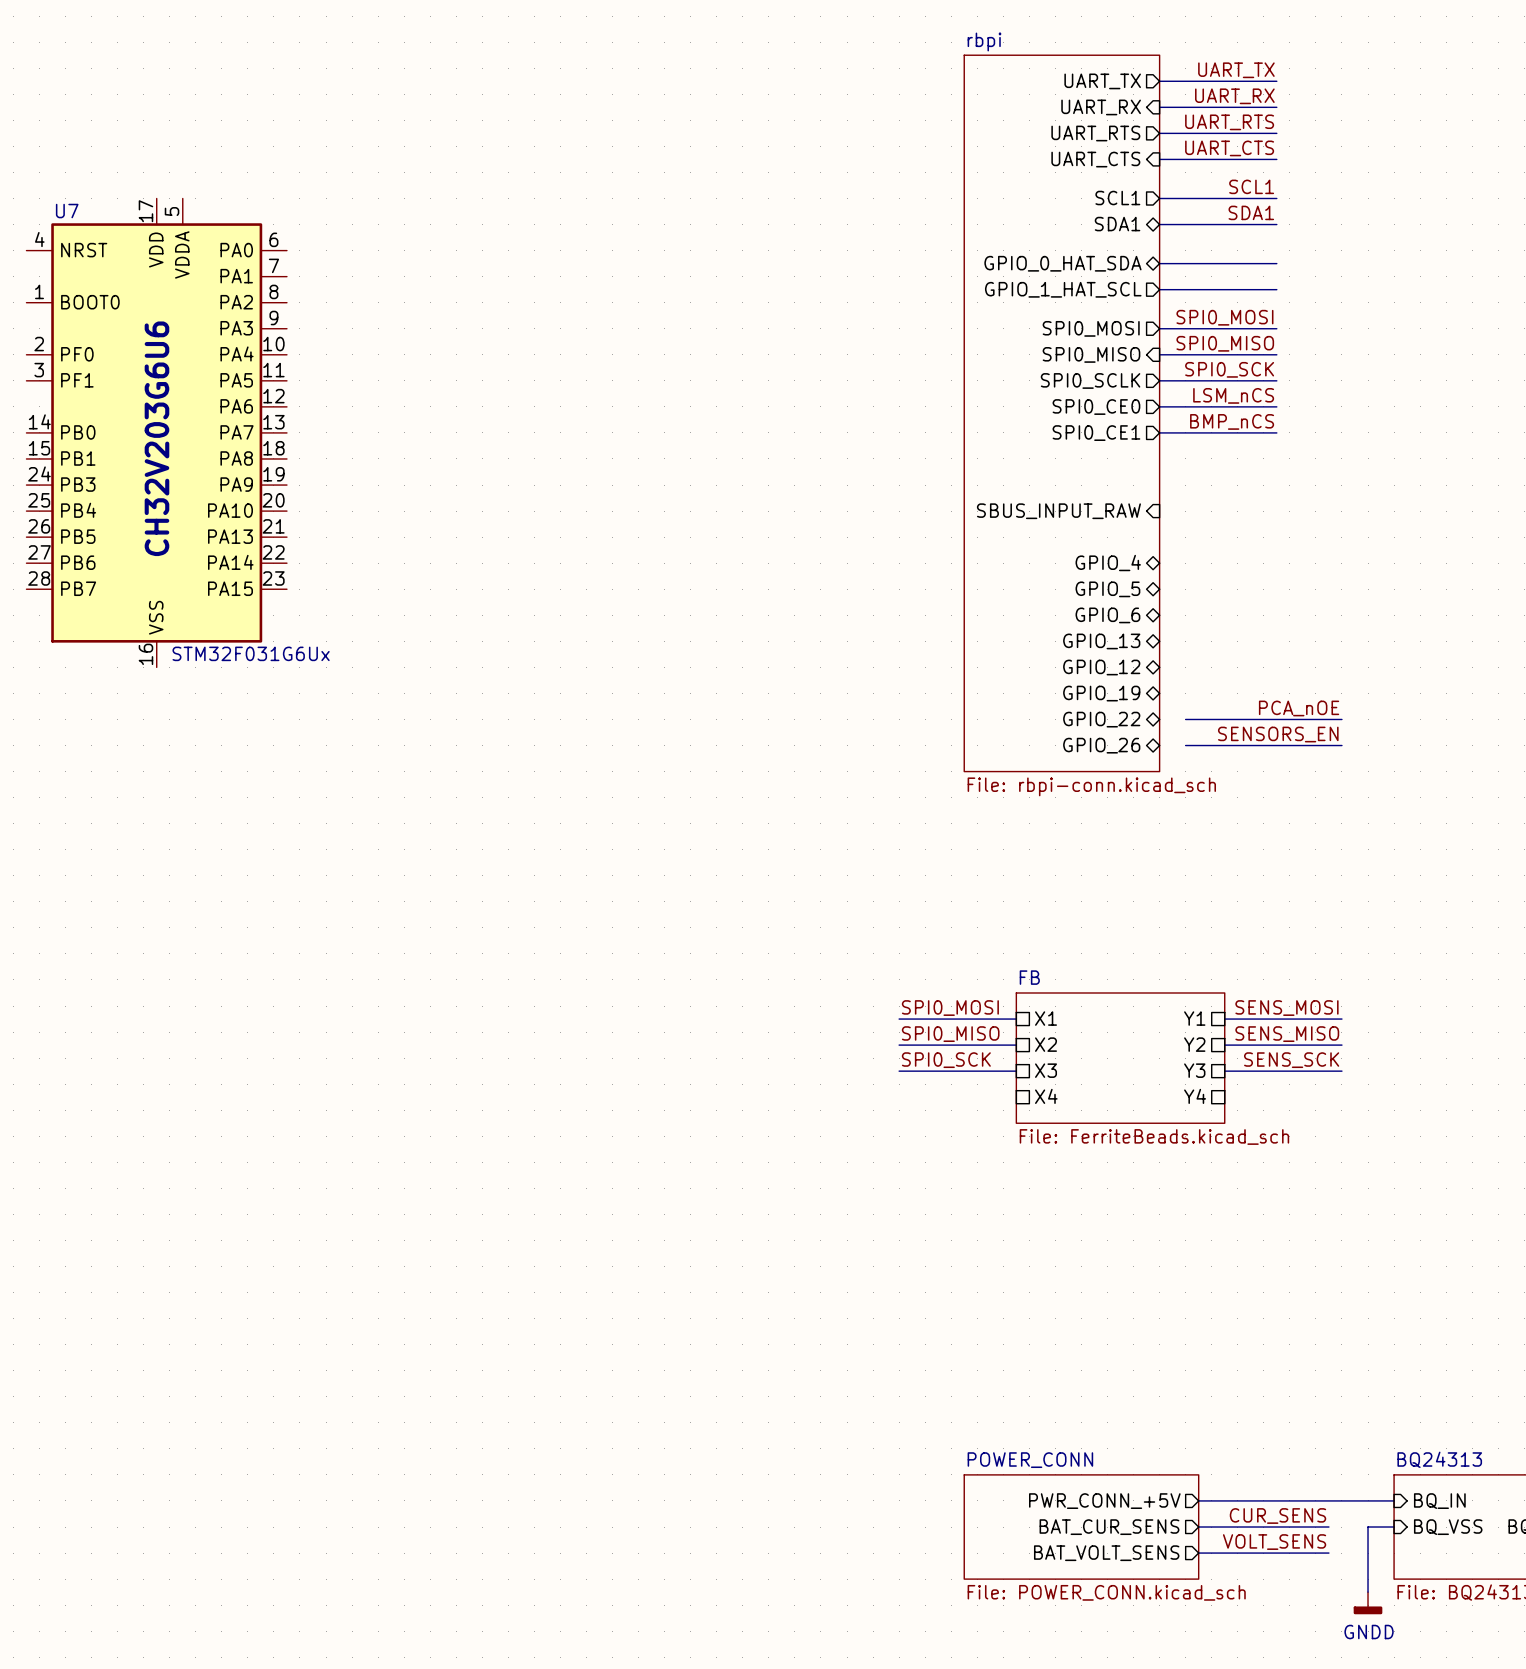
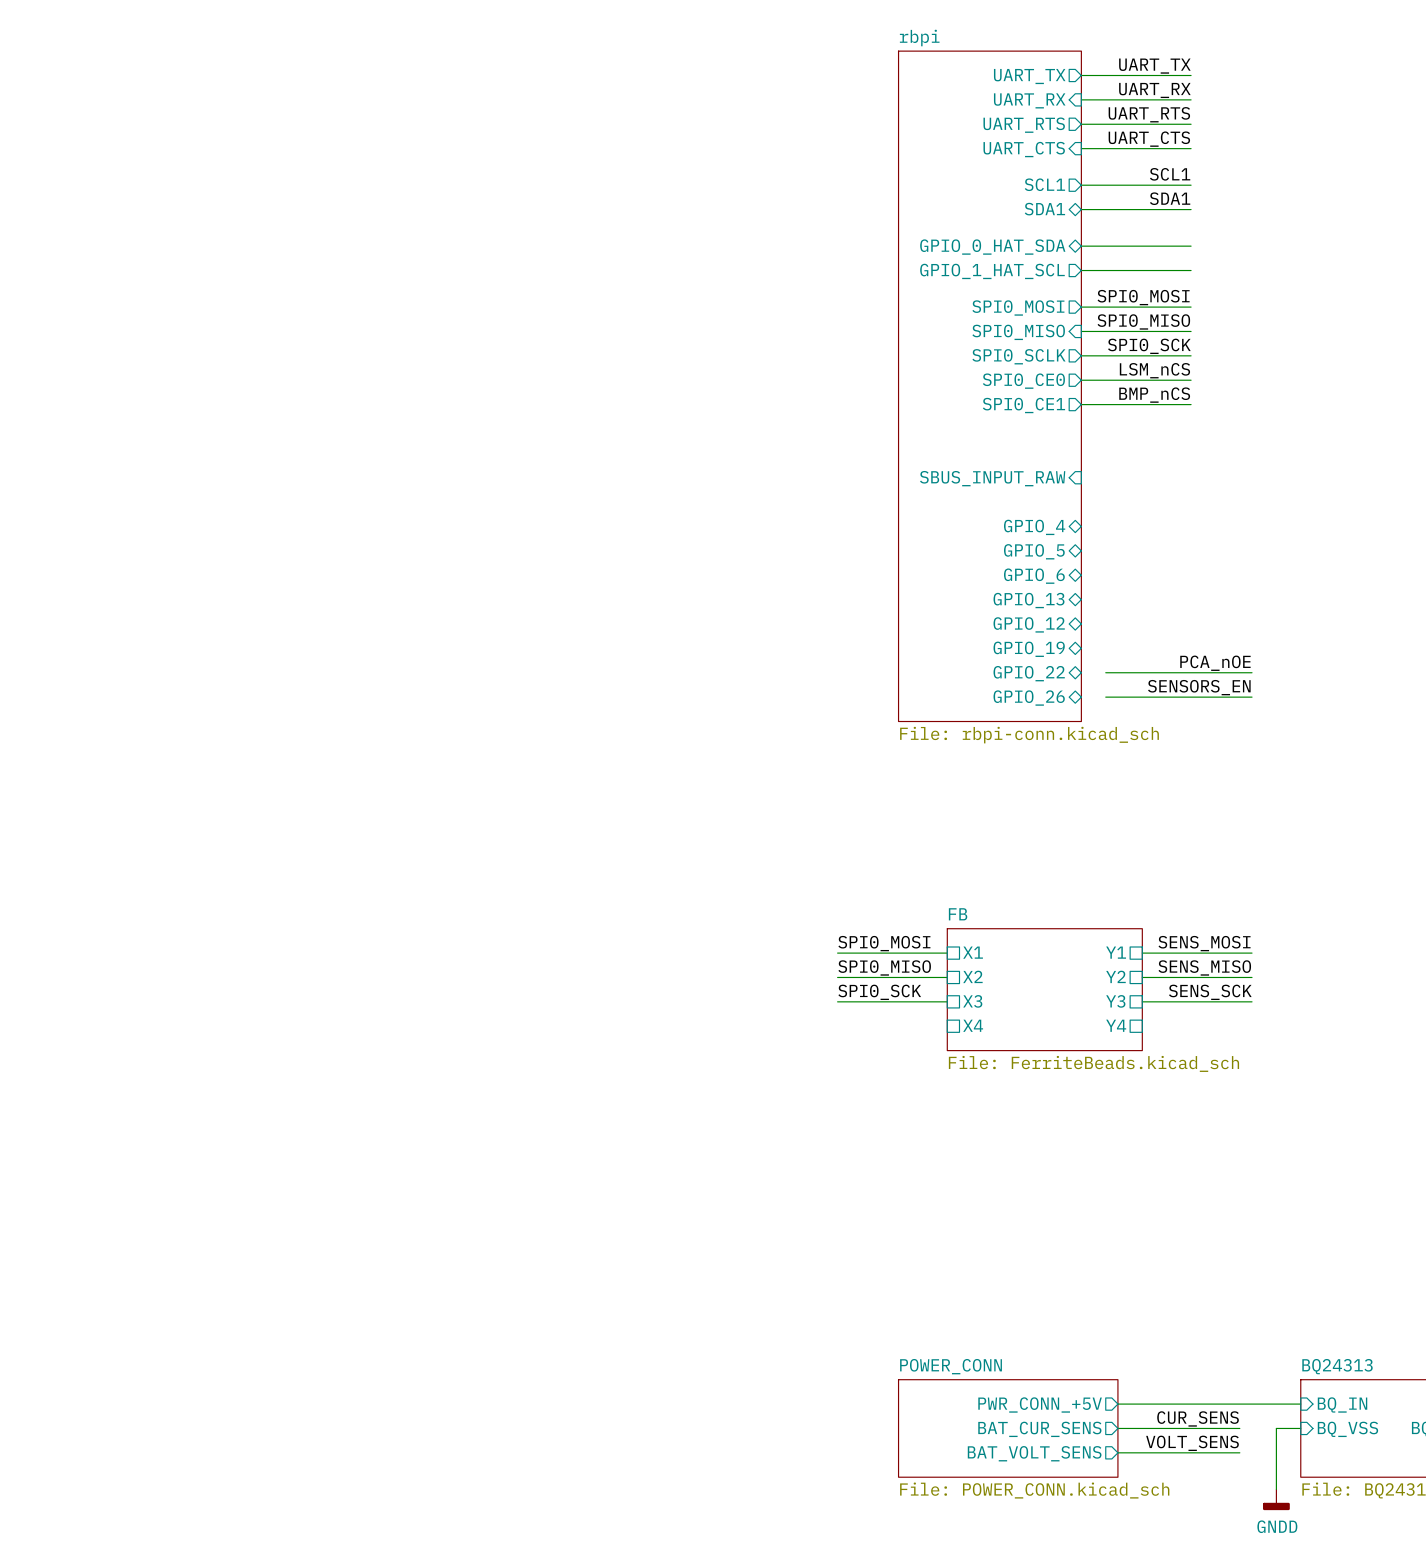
U7: STM32F031G6Ux (156, 432) -> none
text: CH32V203G6U6 (156, 438) -> none

